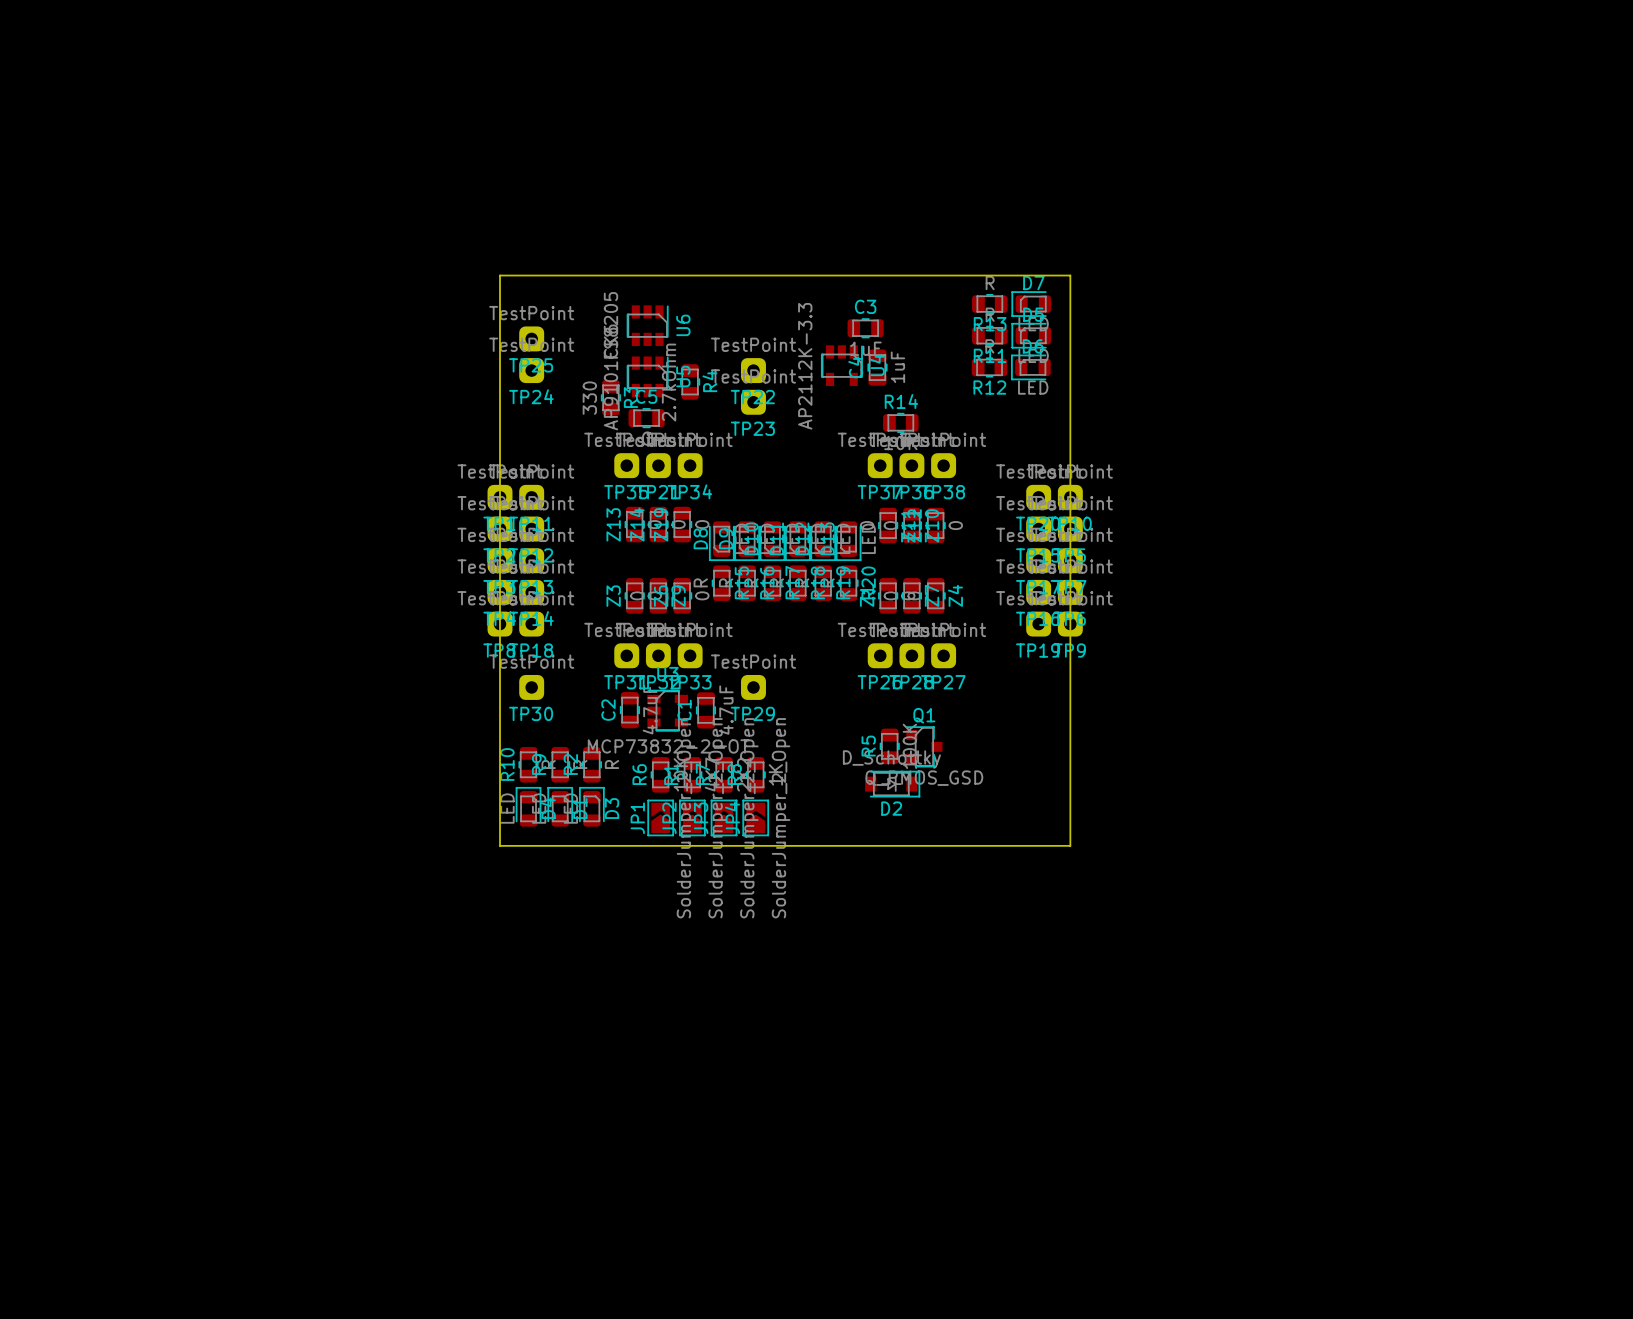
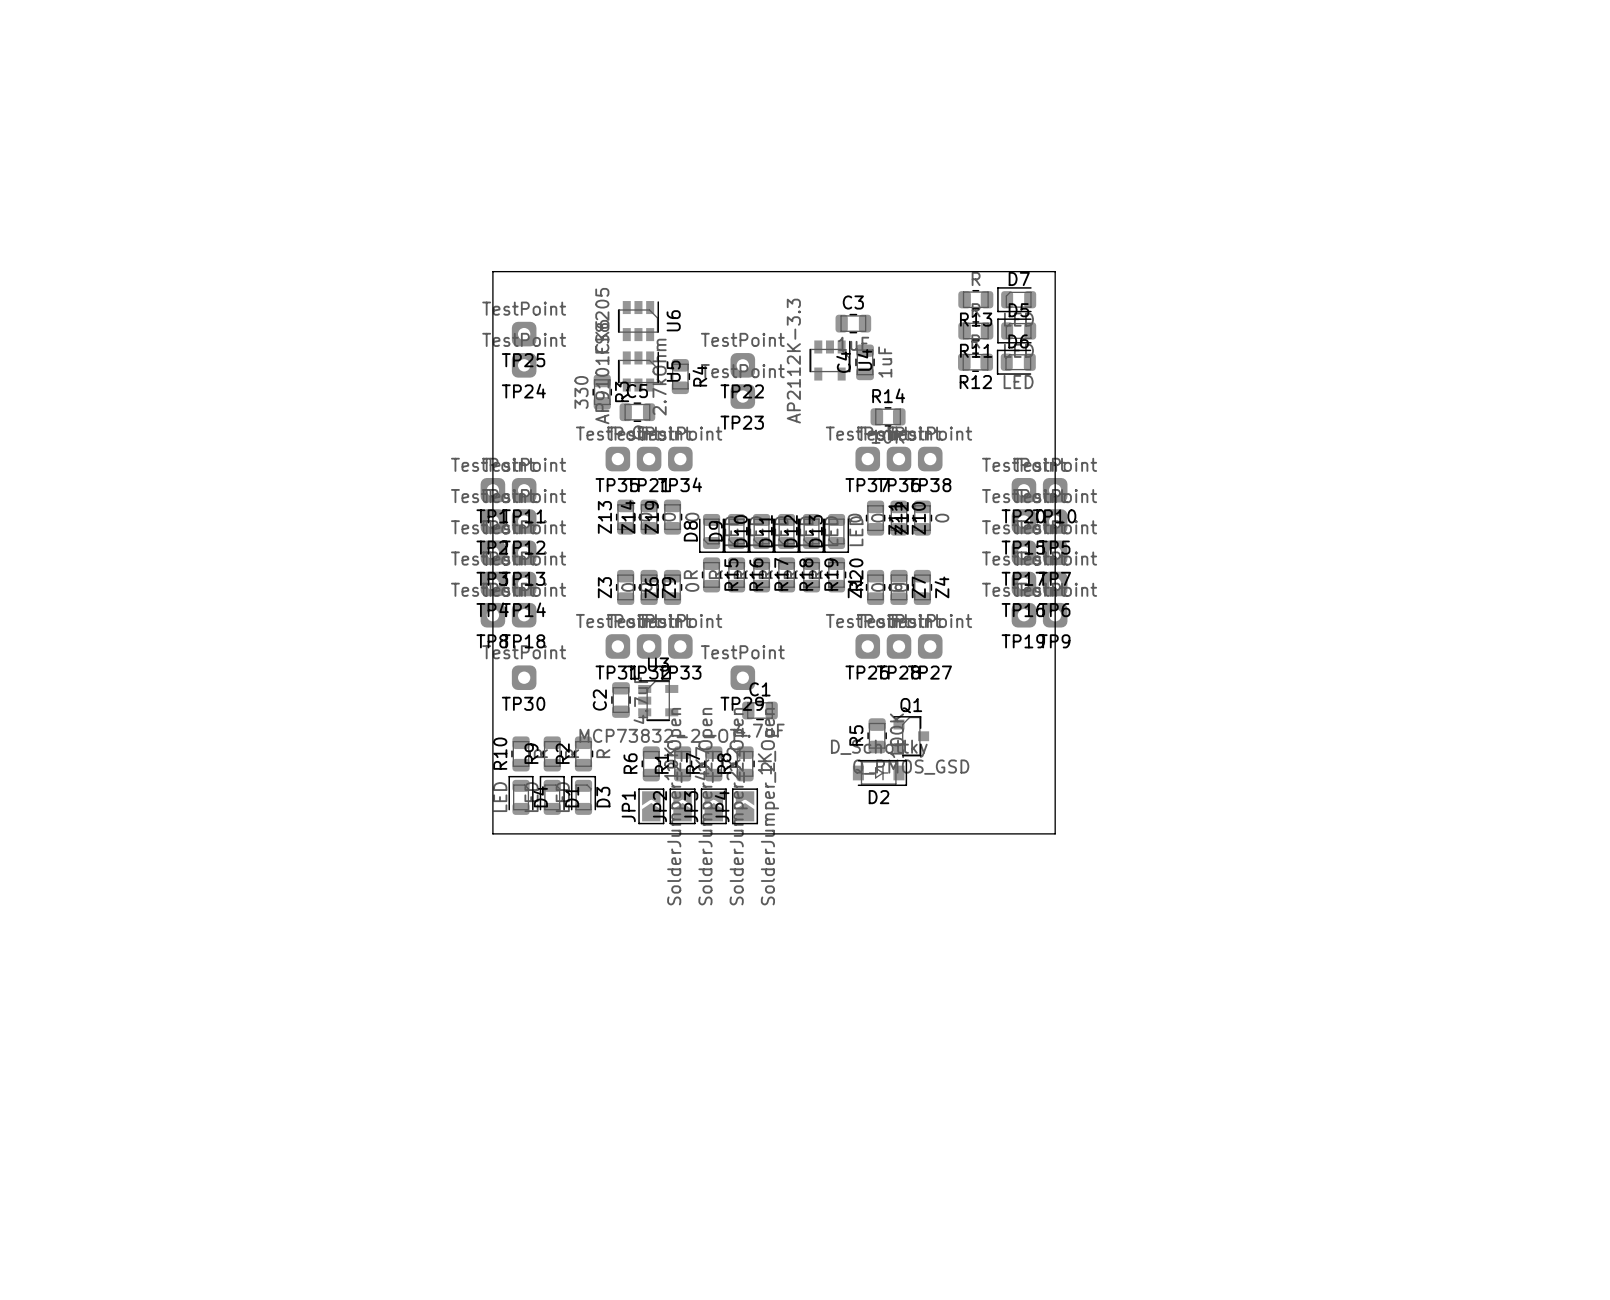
C1 rotation: 0° (705, 710) -> 90° clockwise (759, 710)
C1 position: (705, 710) -> (759, 710)

